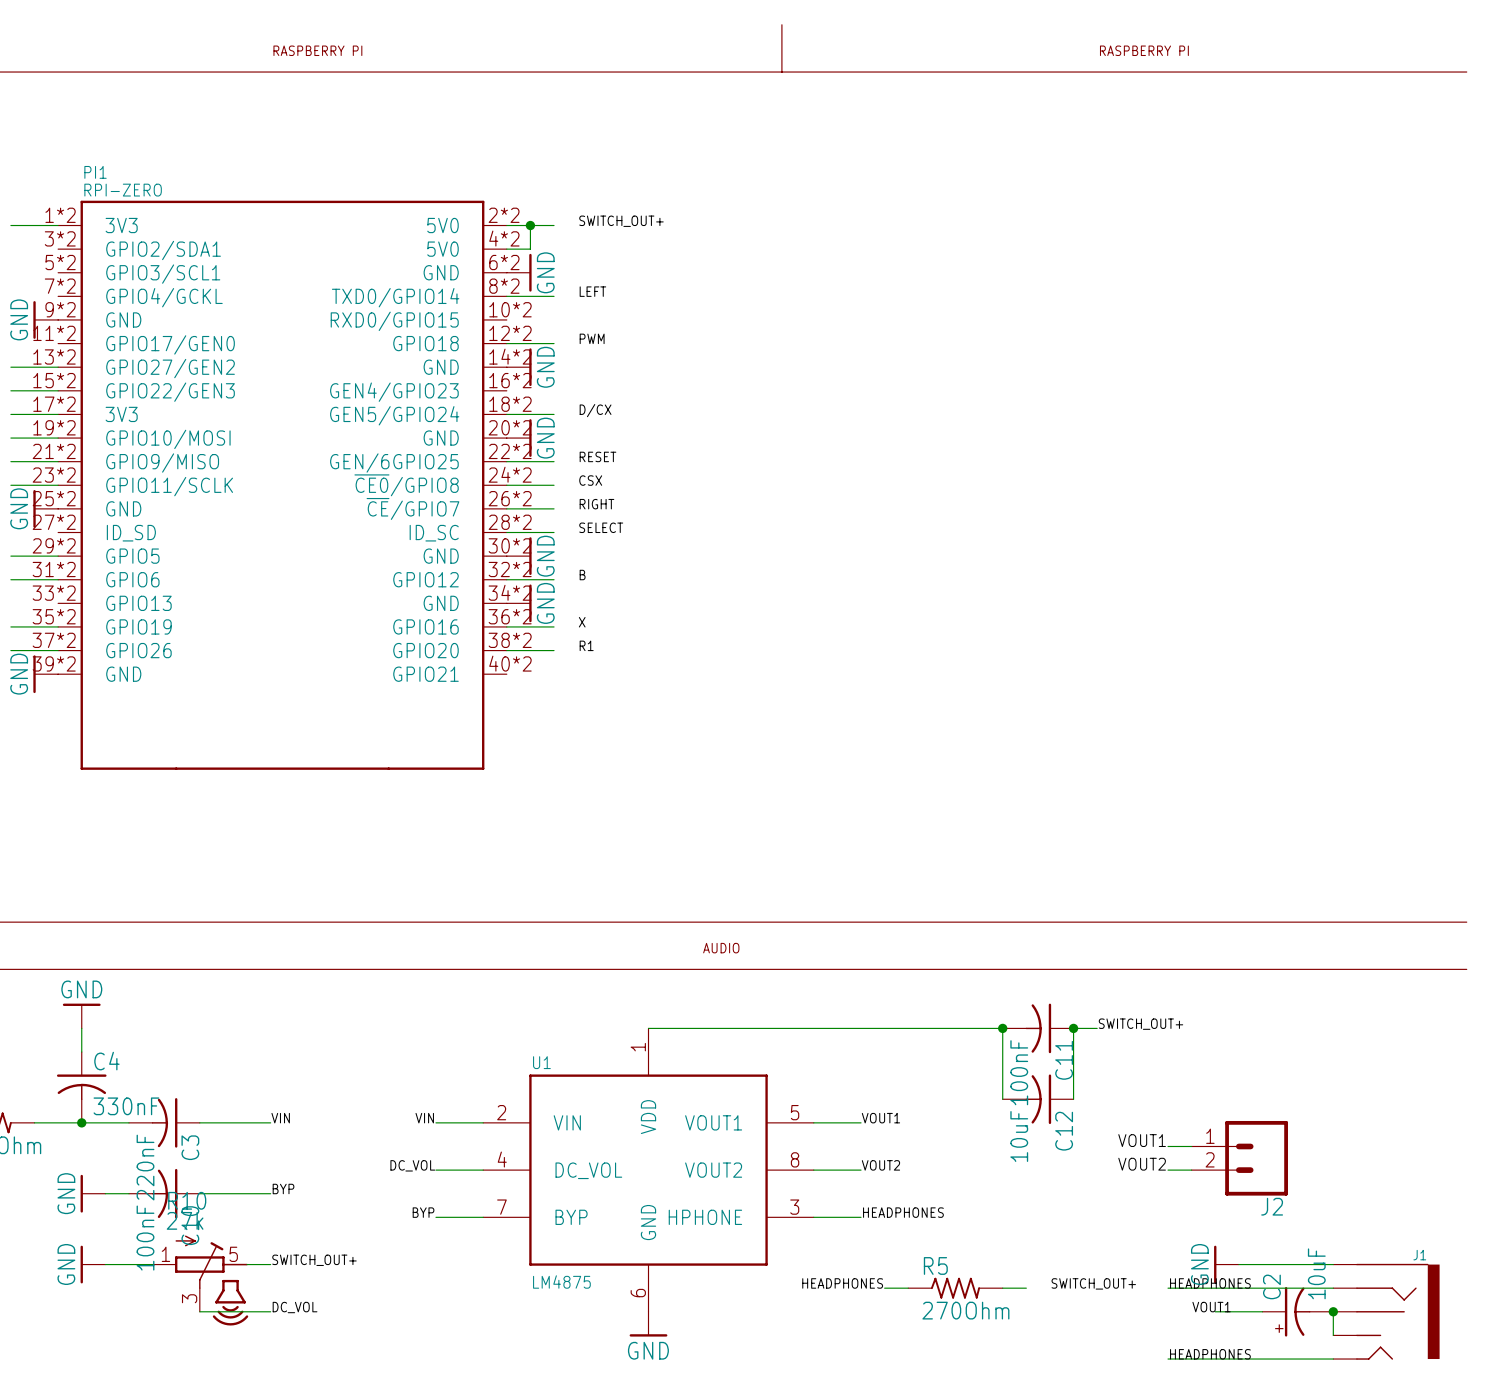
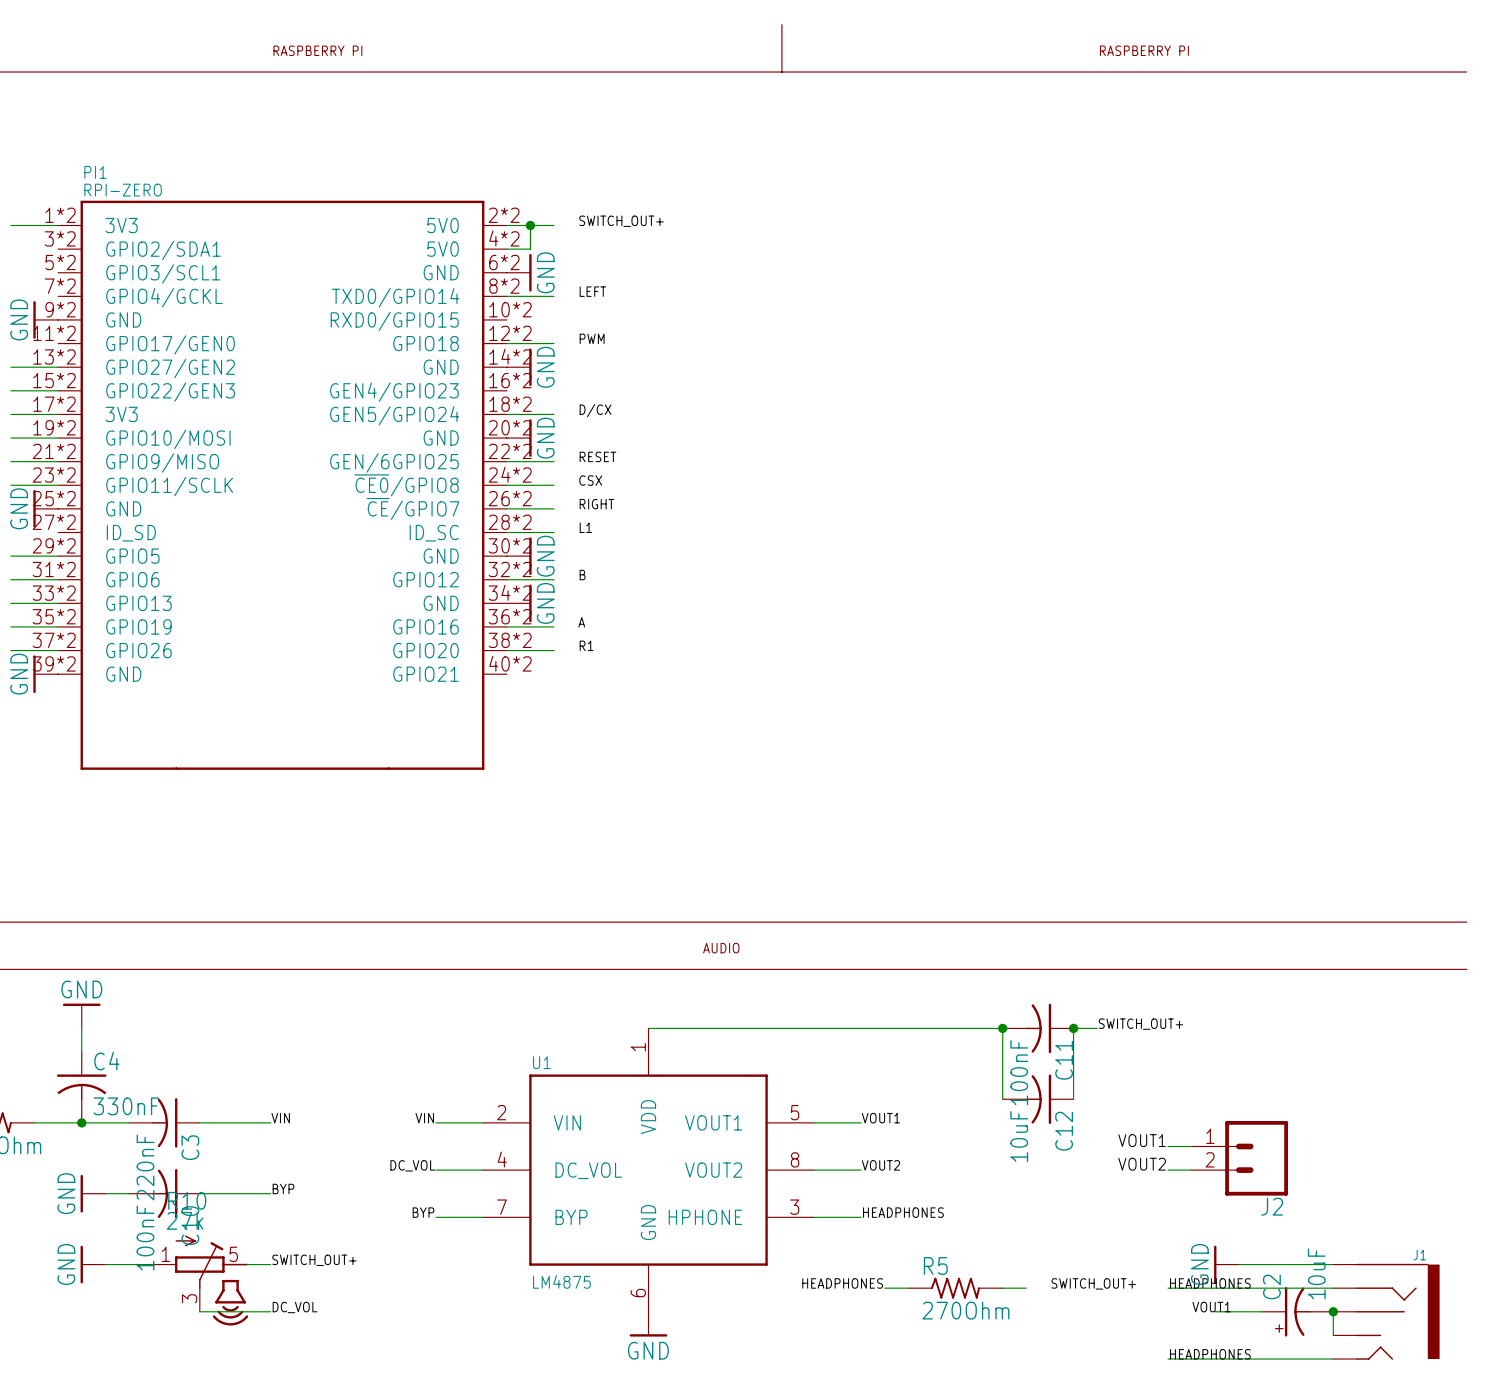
label: SELECT (601, 527) -> L1 (585, 527)
wire: none -> (10, 603) (58, 603)
label: X (582, 622) -> A (581, 622)

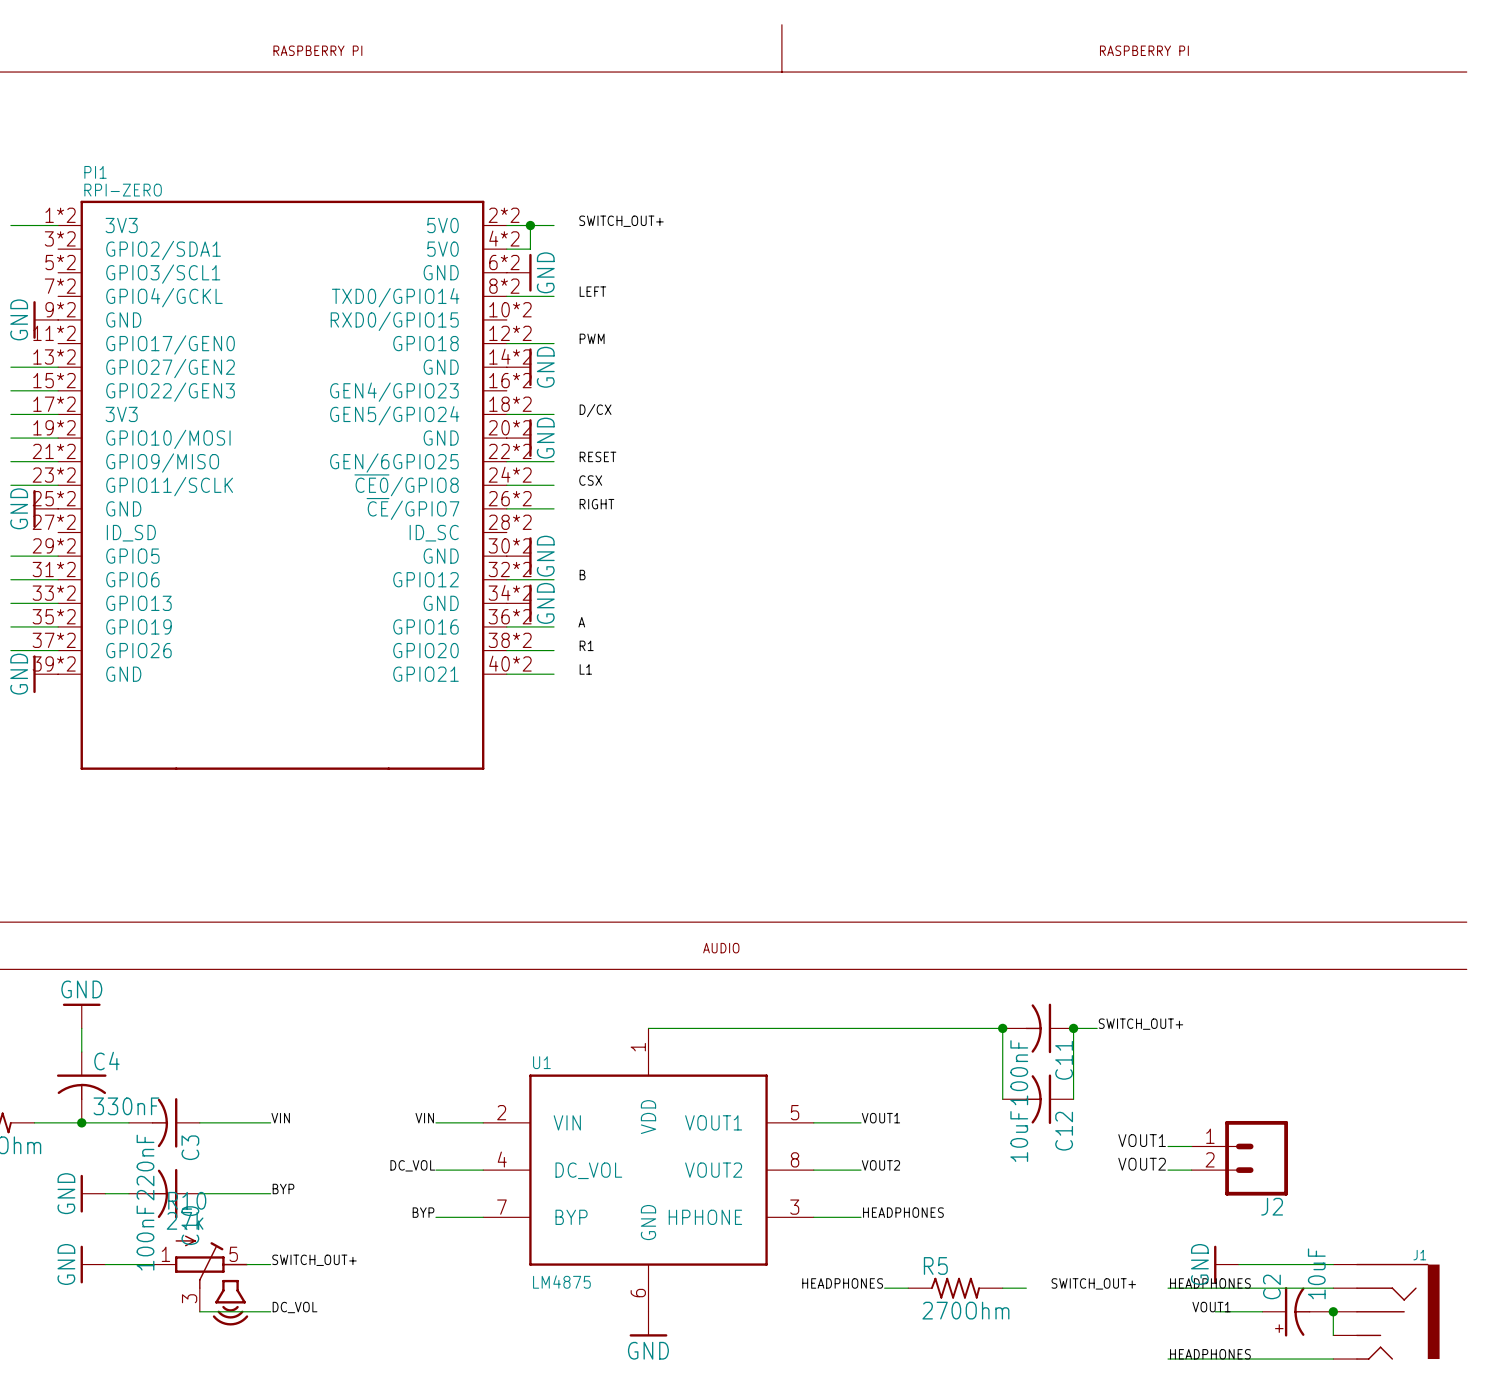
label position: L1 (585, 527) -> L1 (585, 669)
wire: (506, 532) (554, 532) -> (506, 674) (554, 674)

